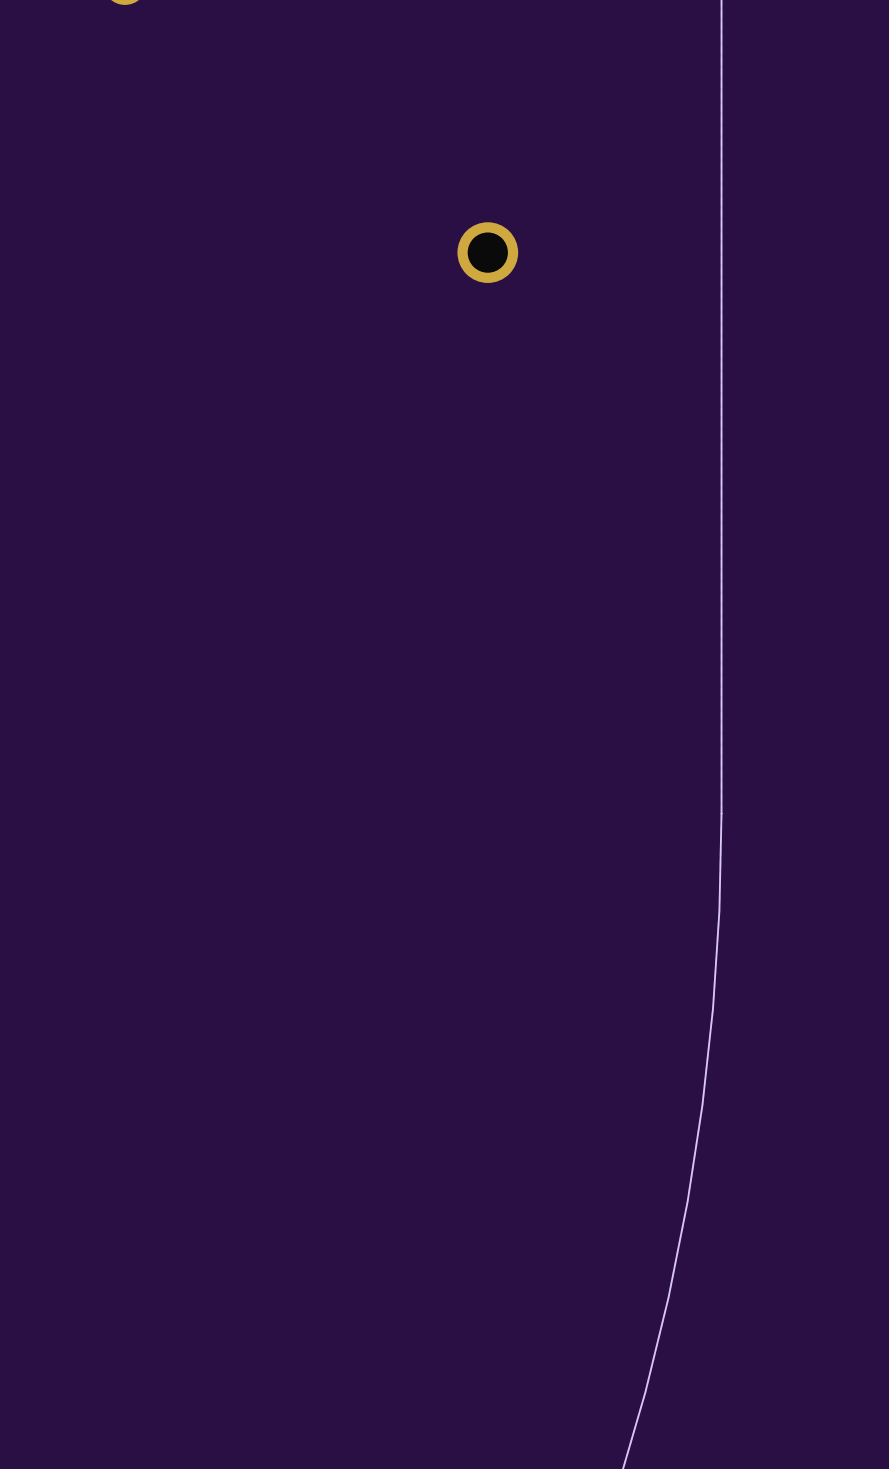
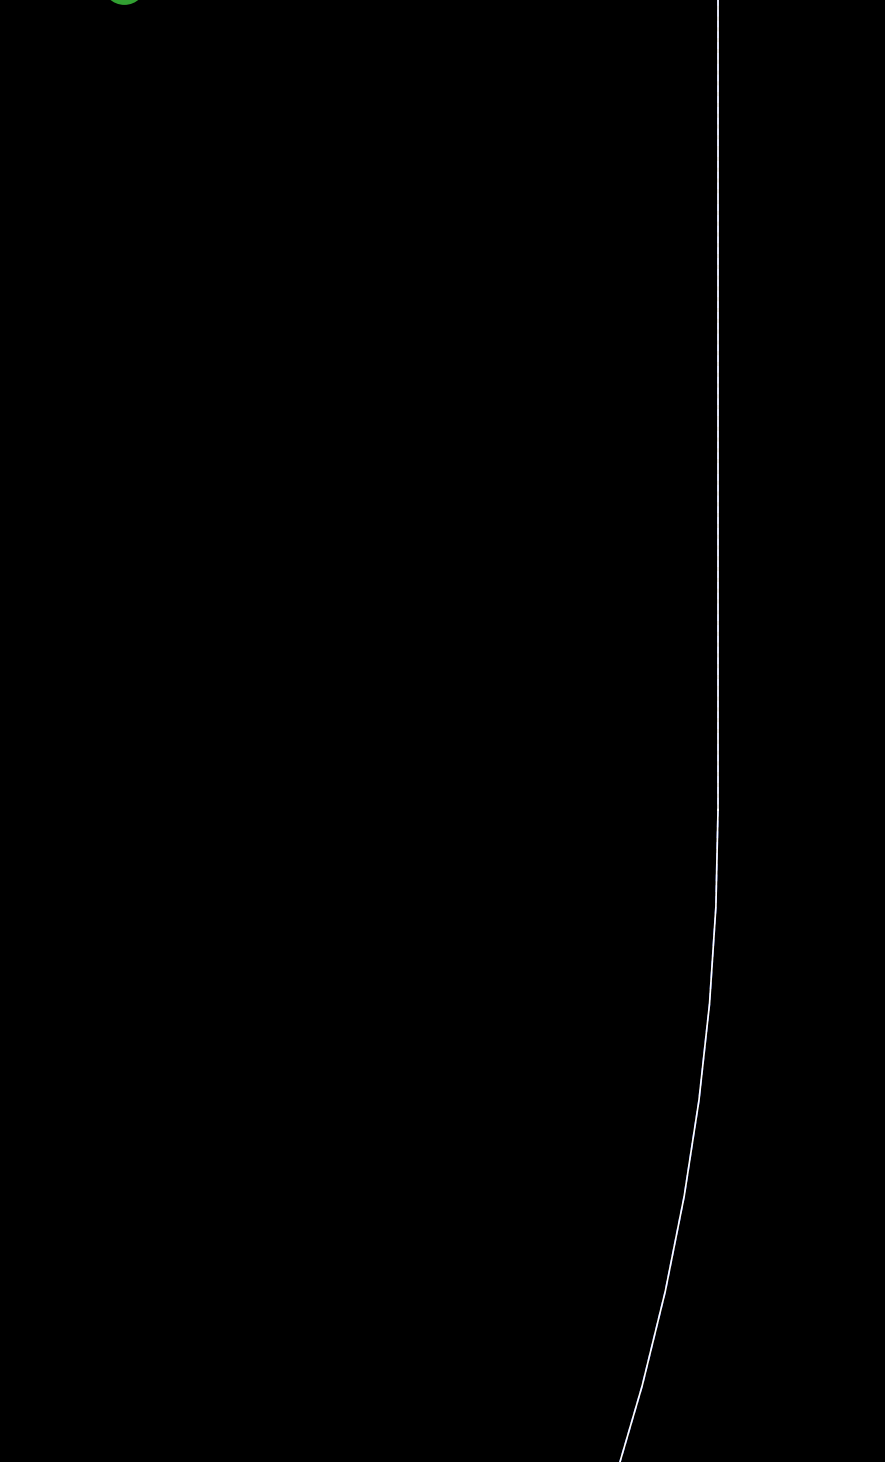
via: (487, 252) -> none

